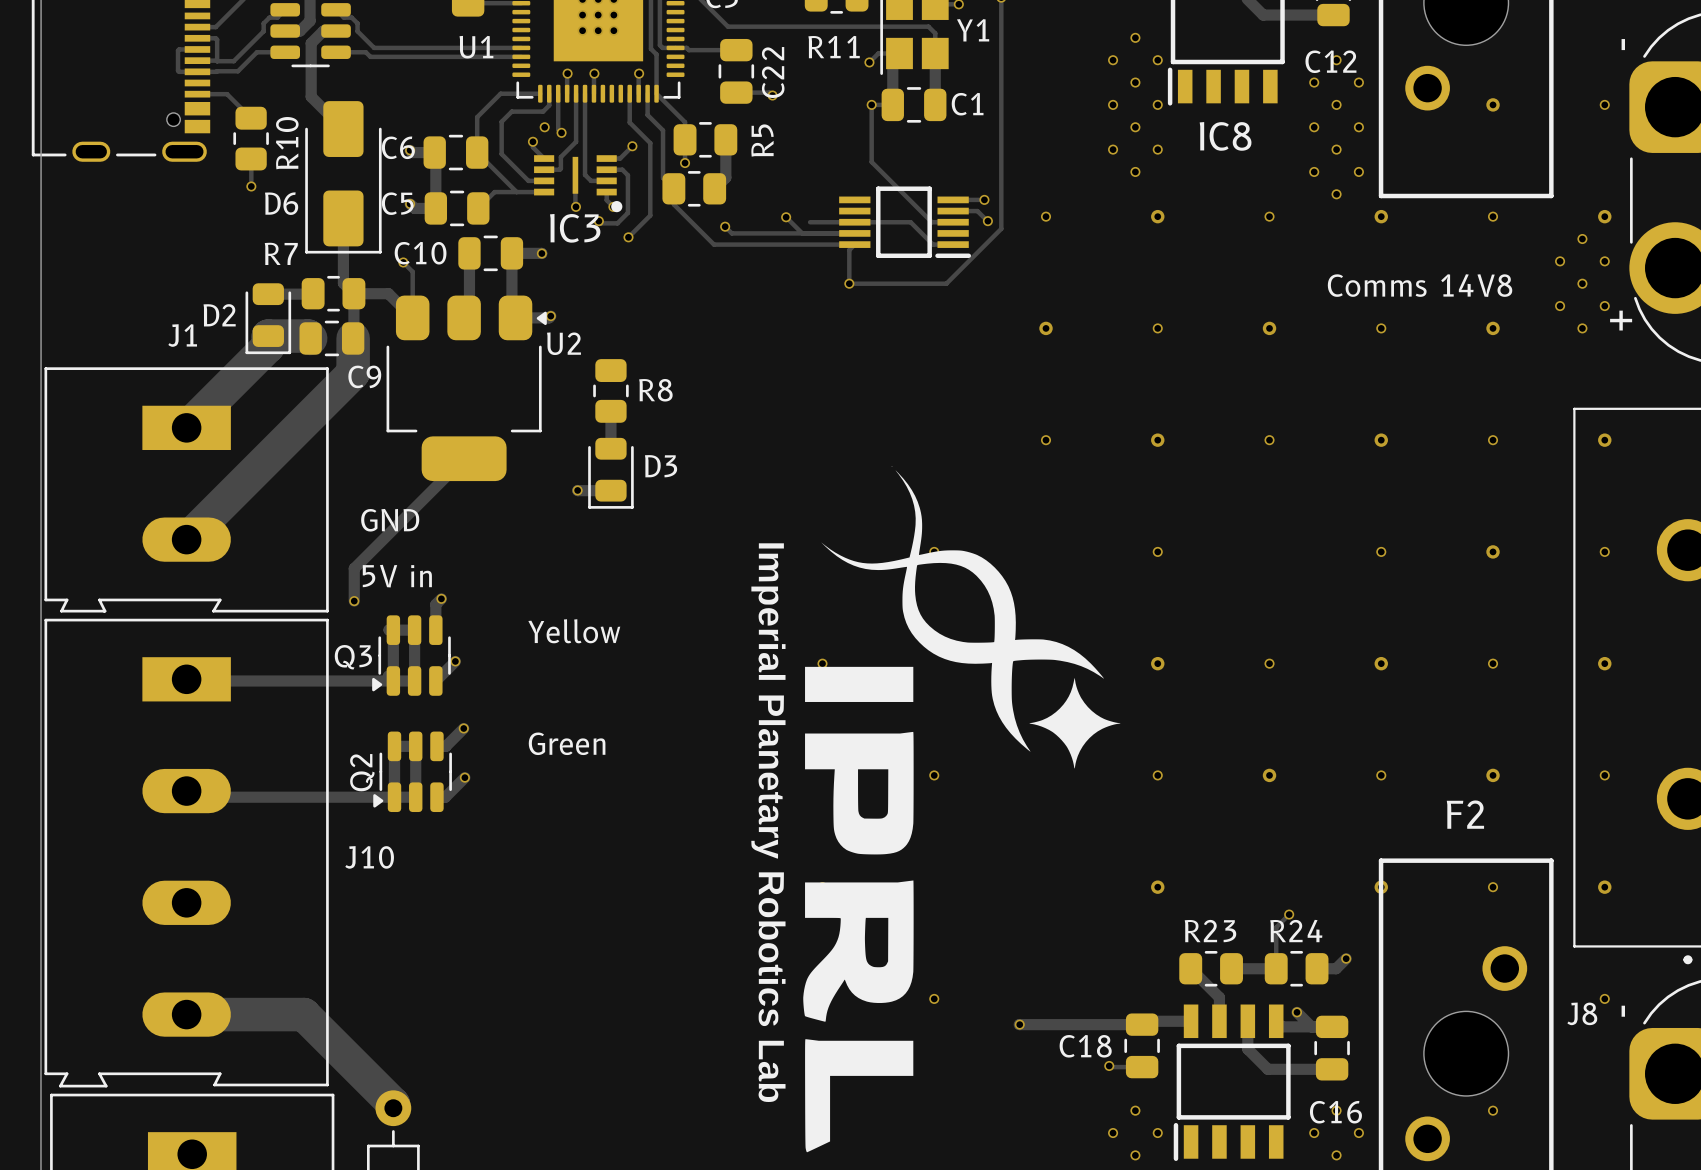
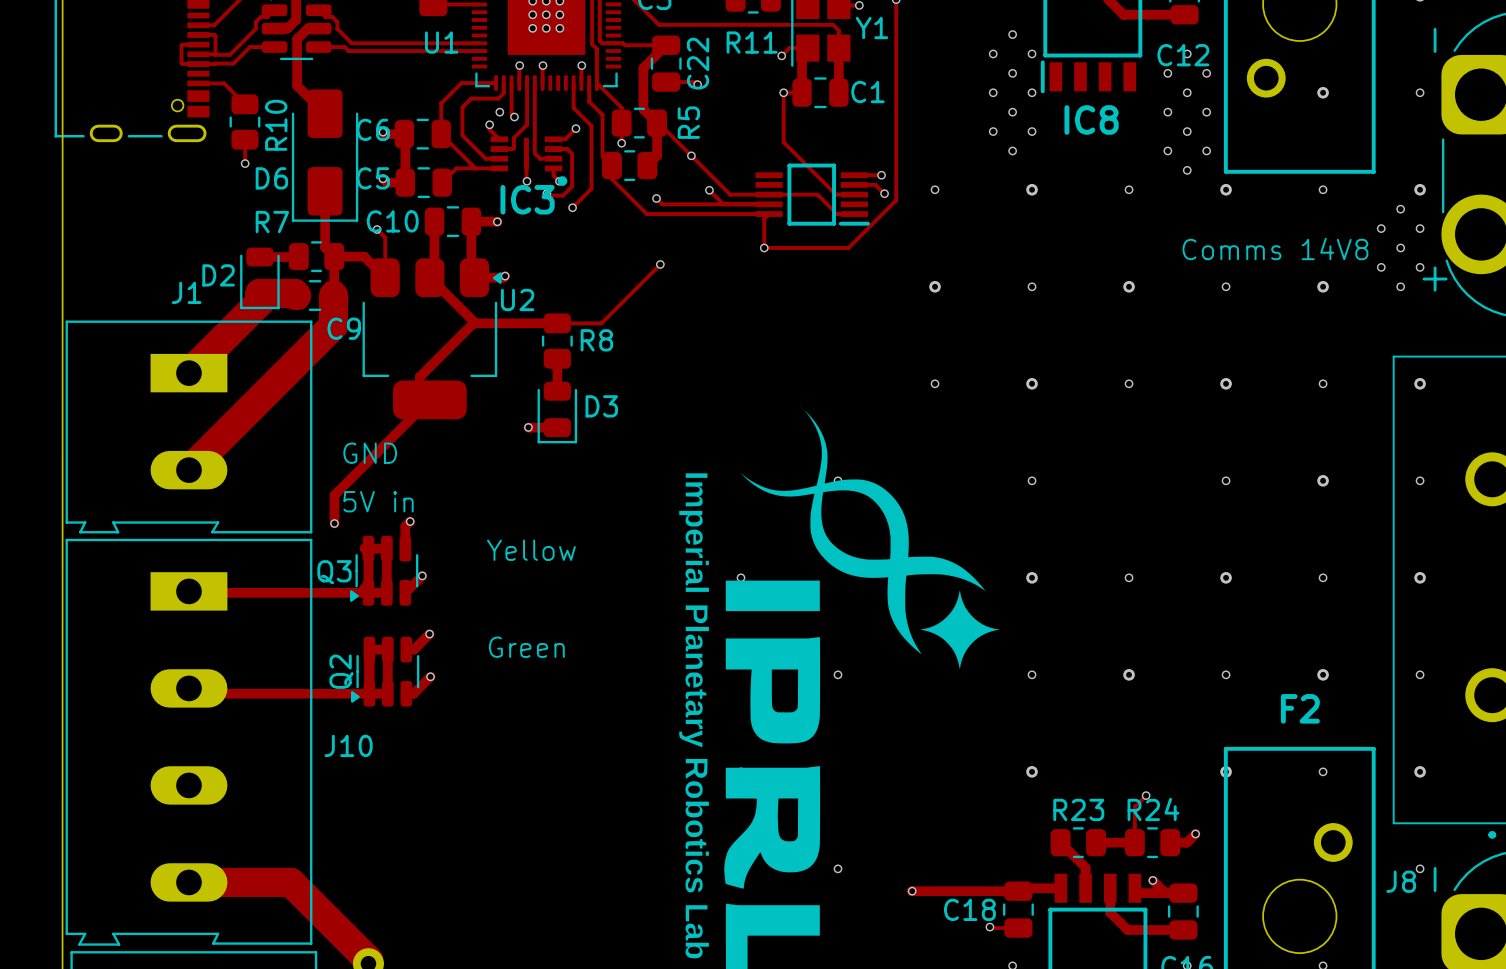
track: none -> (666, 45) (643, 68) (643, 109) (657, 123)
track: none -> (658, 123) (730, 194)
via: none -> (691, 155)
track: none -> (660, 264) (601, 323) (473, 323) (419, 377) (419, 389) (429, 399)
via: none -> (660, 264)
track: none -> (429, 277) (475, 323)

